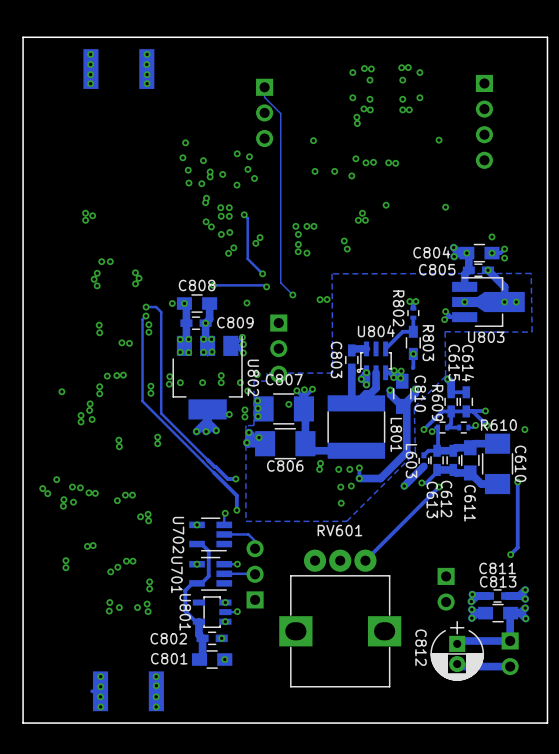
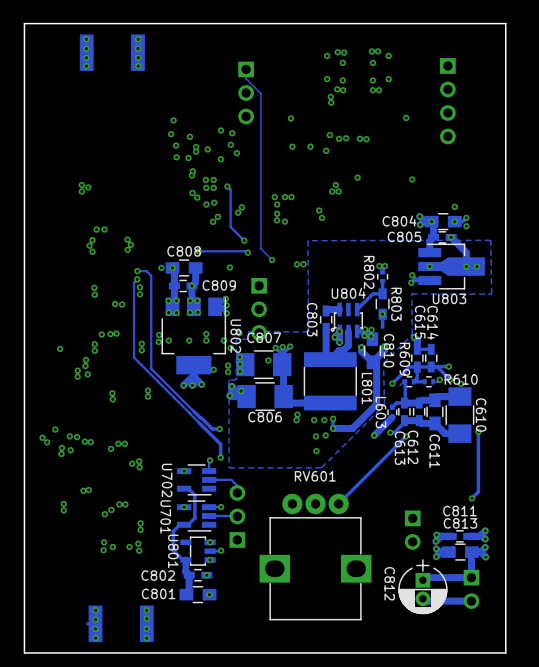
via position: (524, 429) -> (461, 383)
via: (432, 431) -> none

